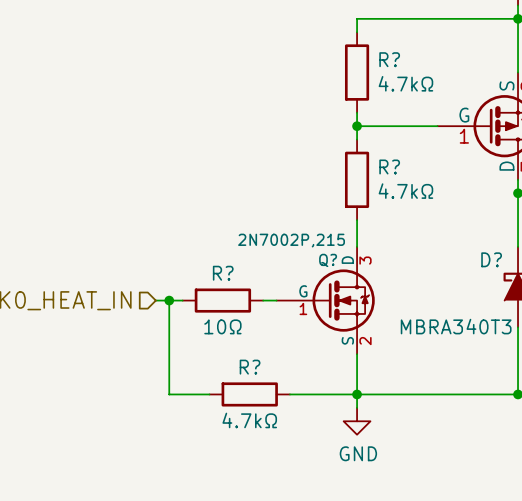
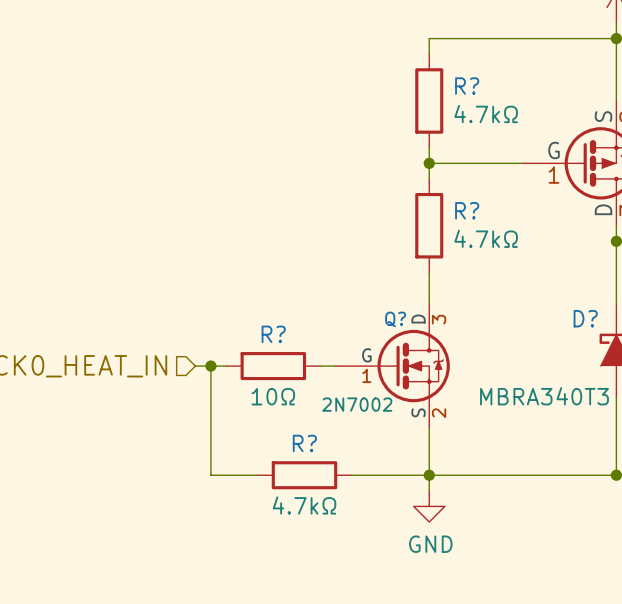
Q? value: 2N7002P,215 (291, 240) -> 2N7002 (357, 404)

